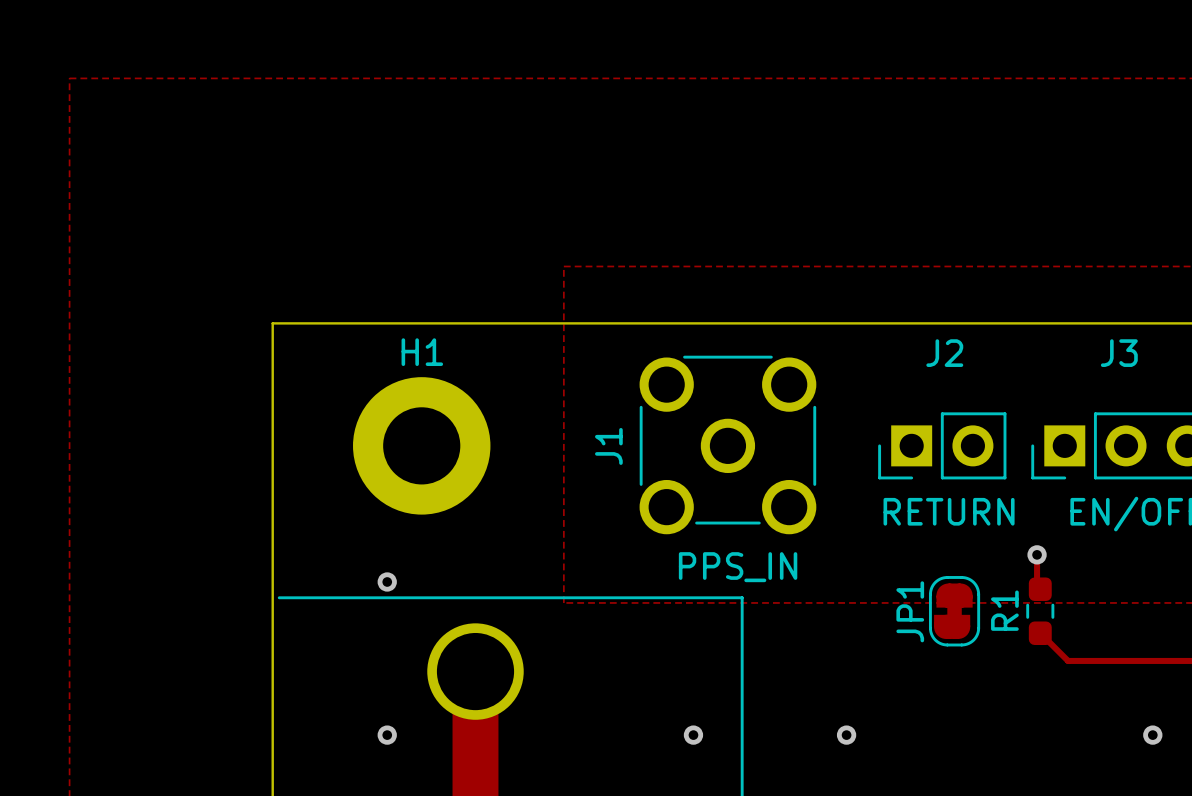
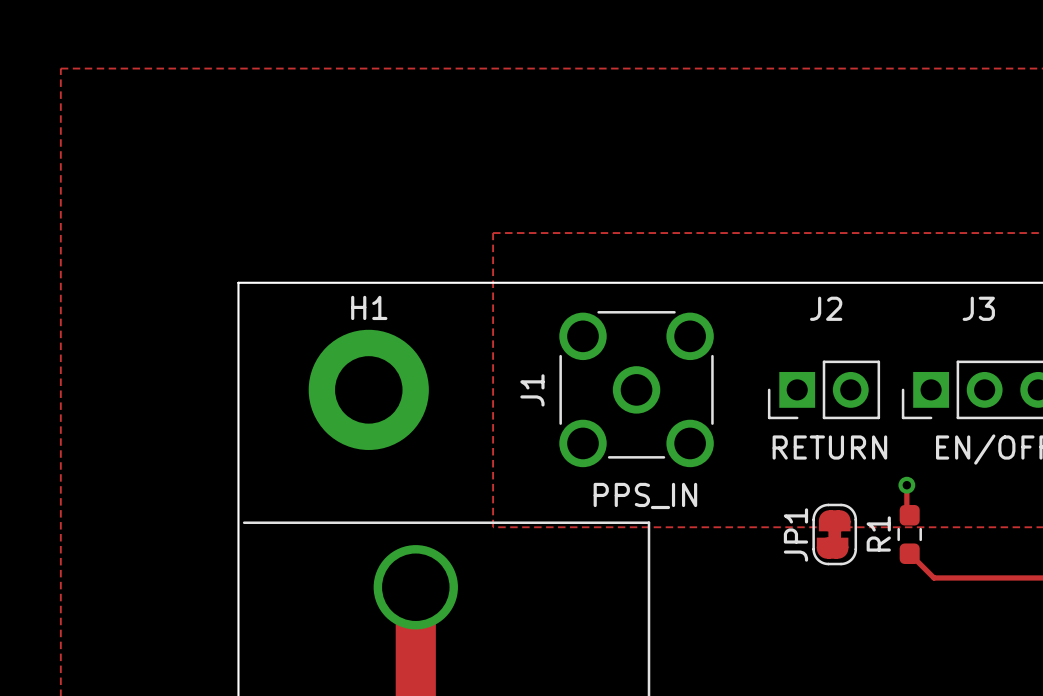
via: (387, 581) -> none
via: (387, 735) -> none
via: (693, 735) -> none
via: (846, 735) -> none
via: (1152, 735) -> none

